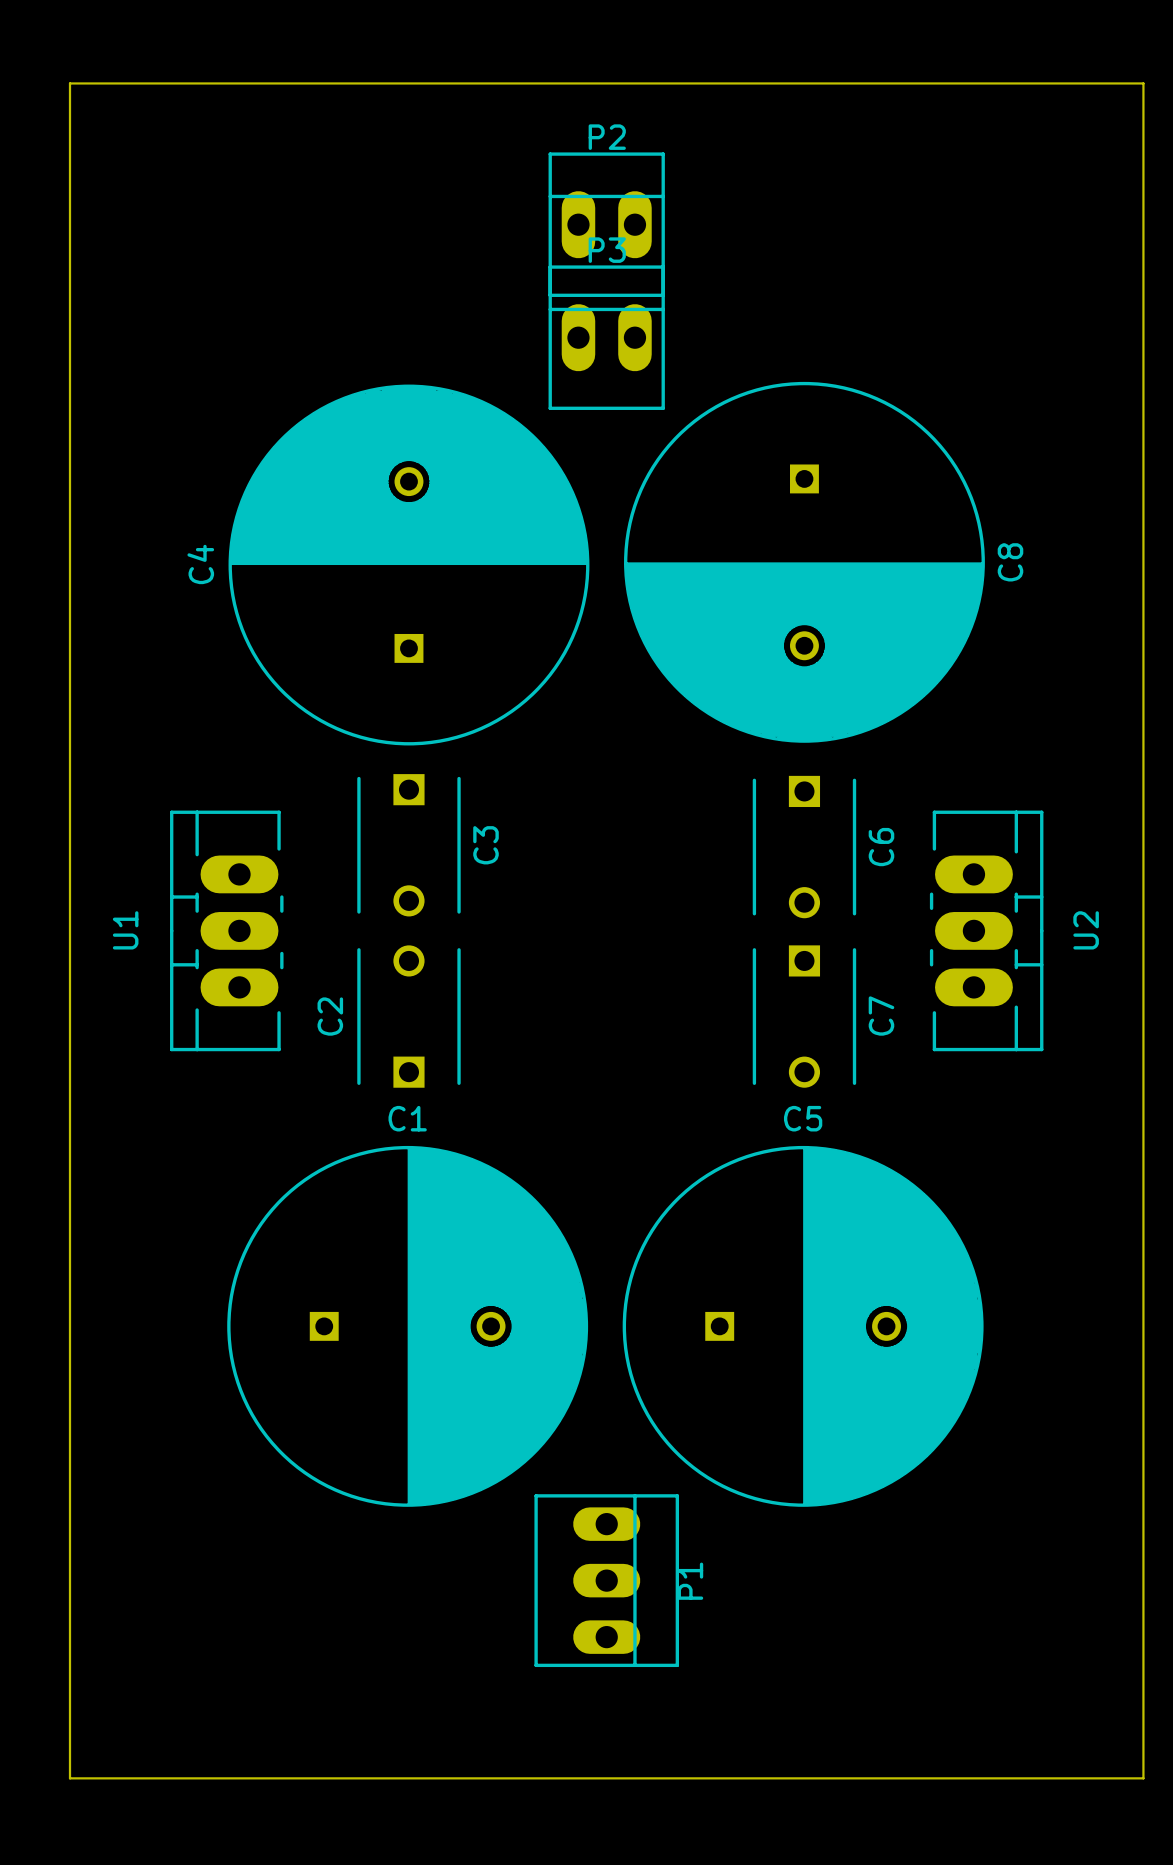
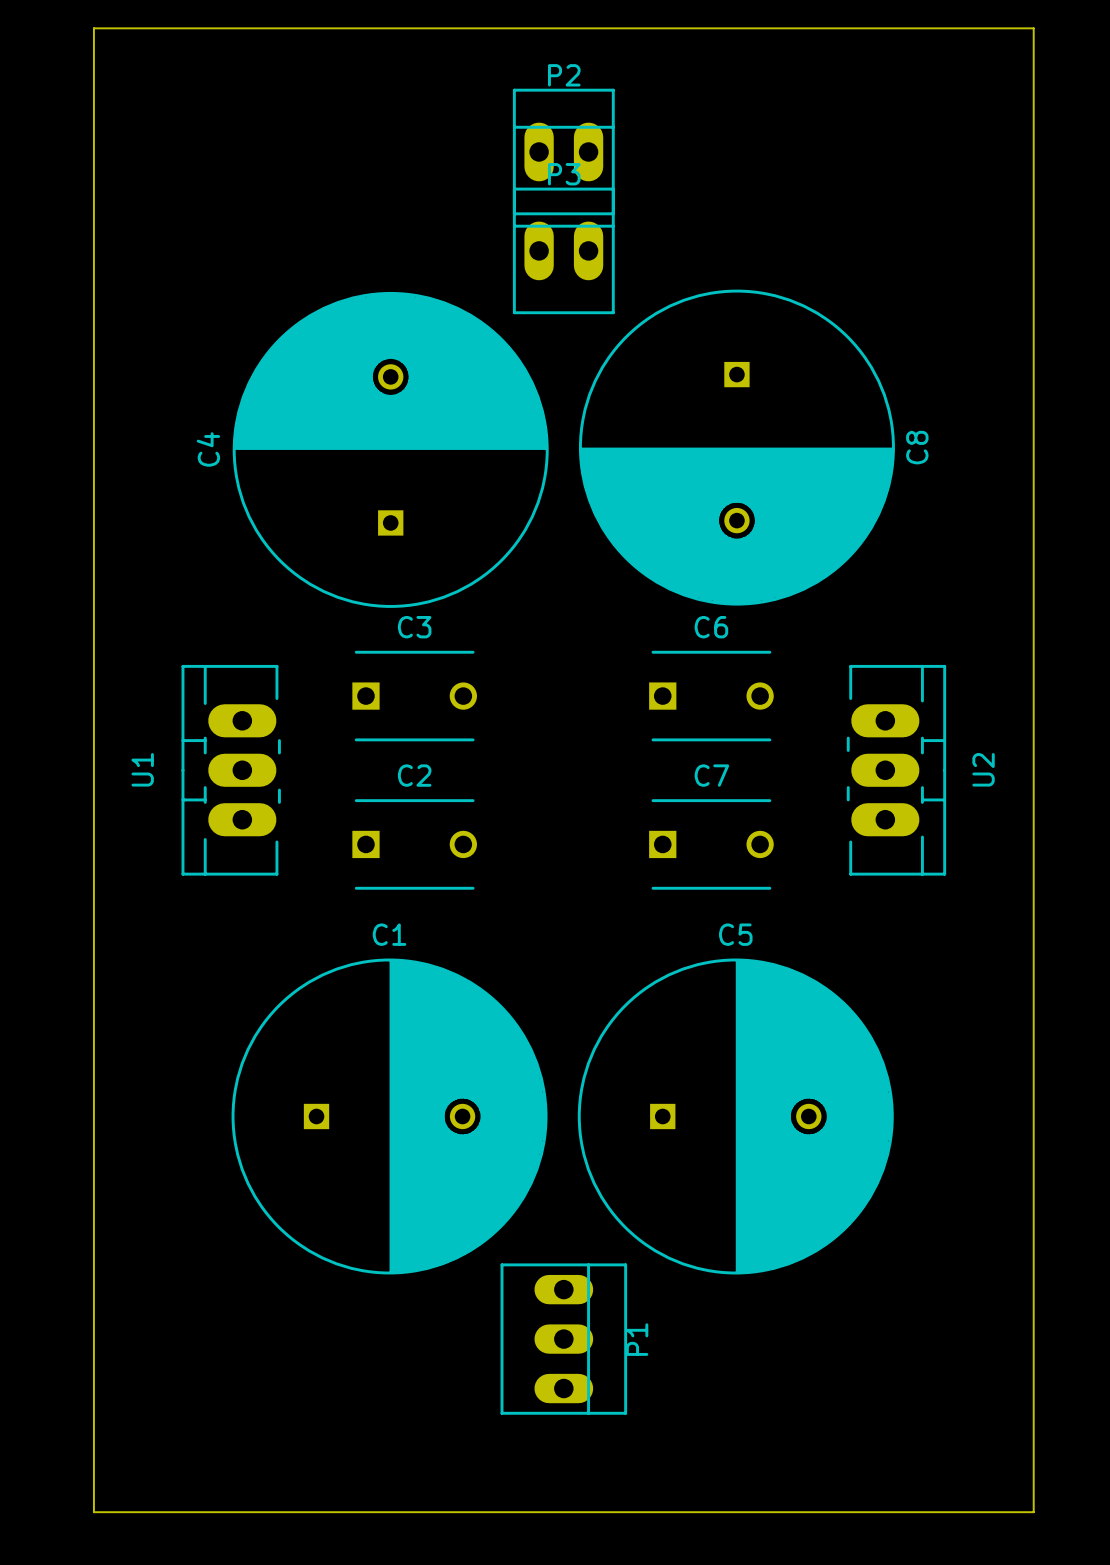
C3 rotation: 0° (408, 845) -> 90° counterclockwise (414, 696)
C6 rotation: 0° (804, 847) -> 90° counterclockwise (711, 696)
C2 rotation: 0° (408, 1016) -> 90° clockwise (414, 844)
C7 rotation: 0° (804, 1016) -> 90° counterclockwise (711, 844)

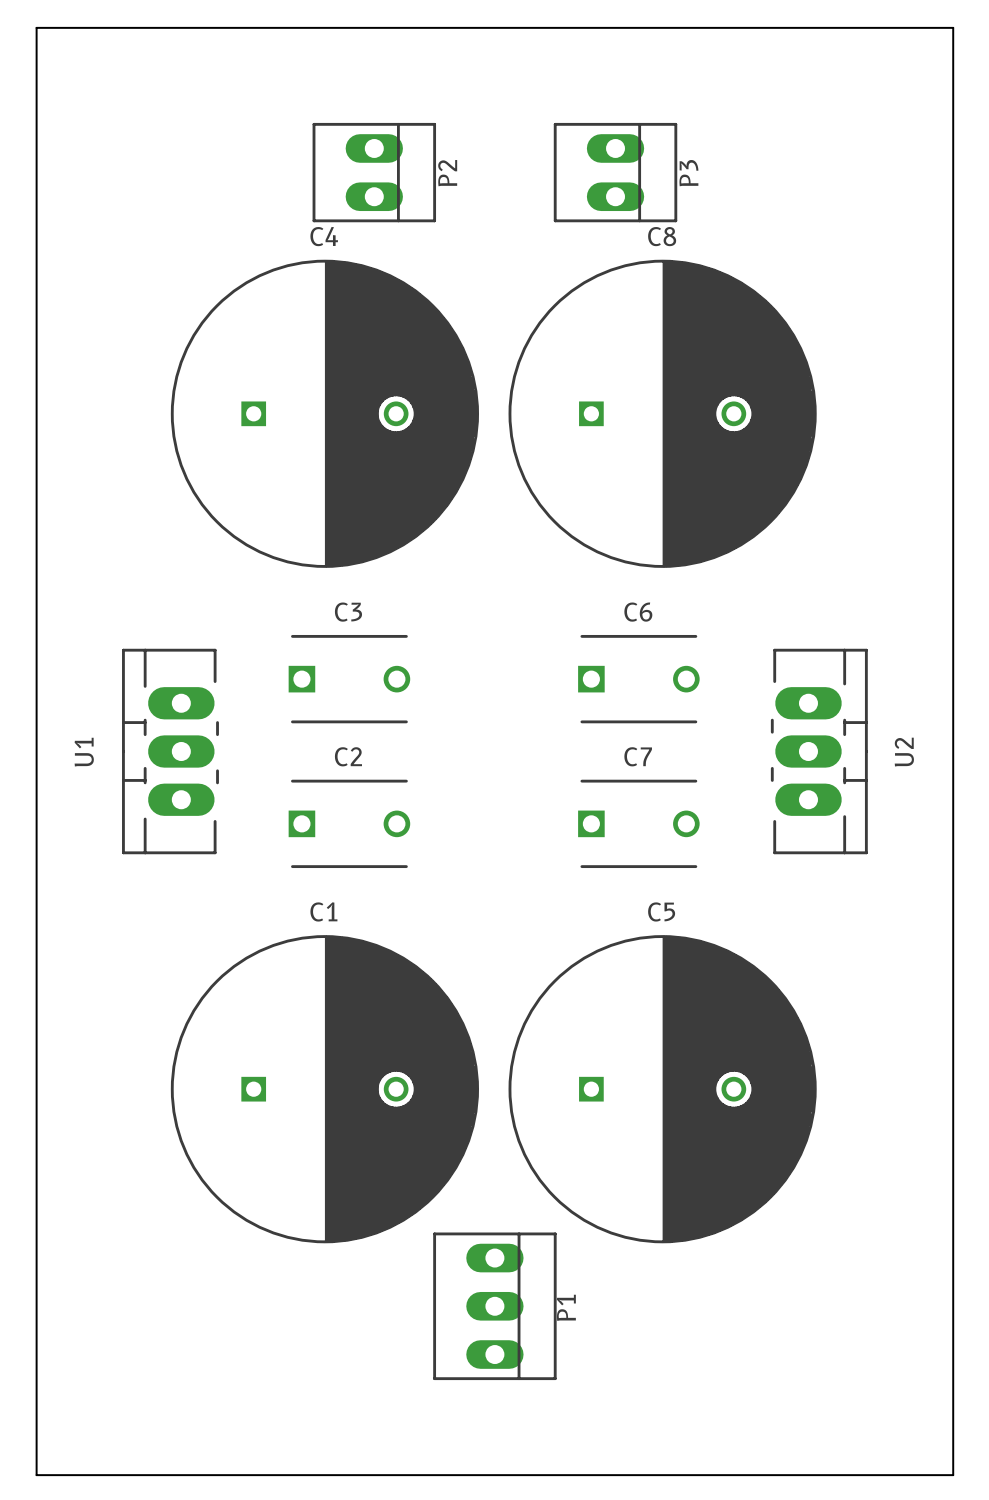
P2 rotation: 0° (563, 151) -> 90° clockwise (374, 172)
P2 position: (563, 151) -> (374, 172)
P3 rotation: 0° (563, 250) -> 90° clockwise (615, 172)
P3 position: (563, 250) -> (615, 172)
C8 rotation: 0° (736, 447) -> 90° counterclockwise (662, 413)
C4 rotation: 0° (390, 449) -> 90° clockwise (324, 413)

